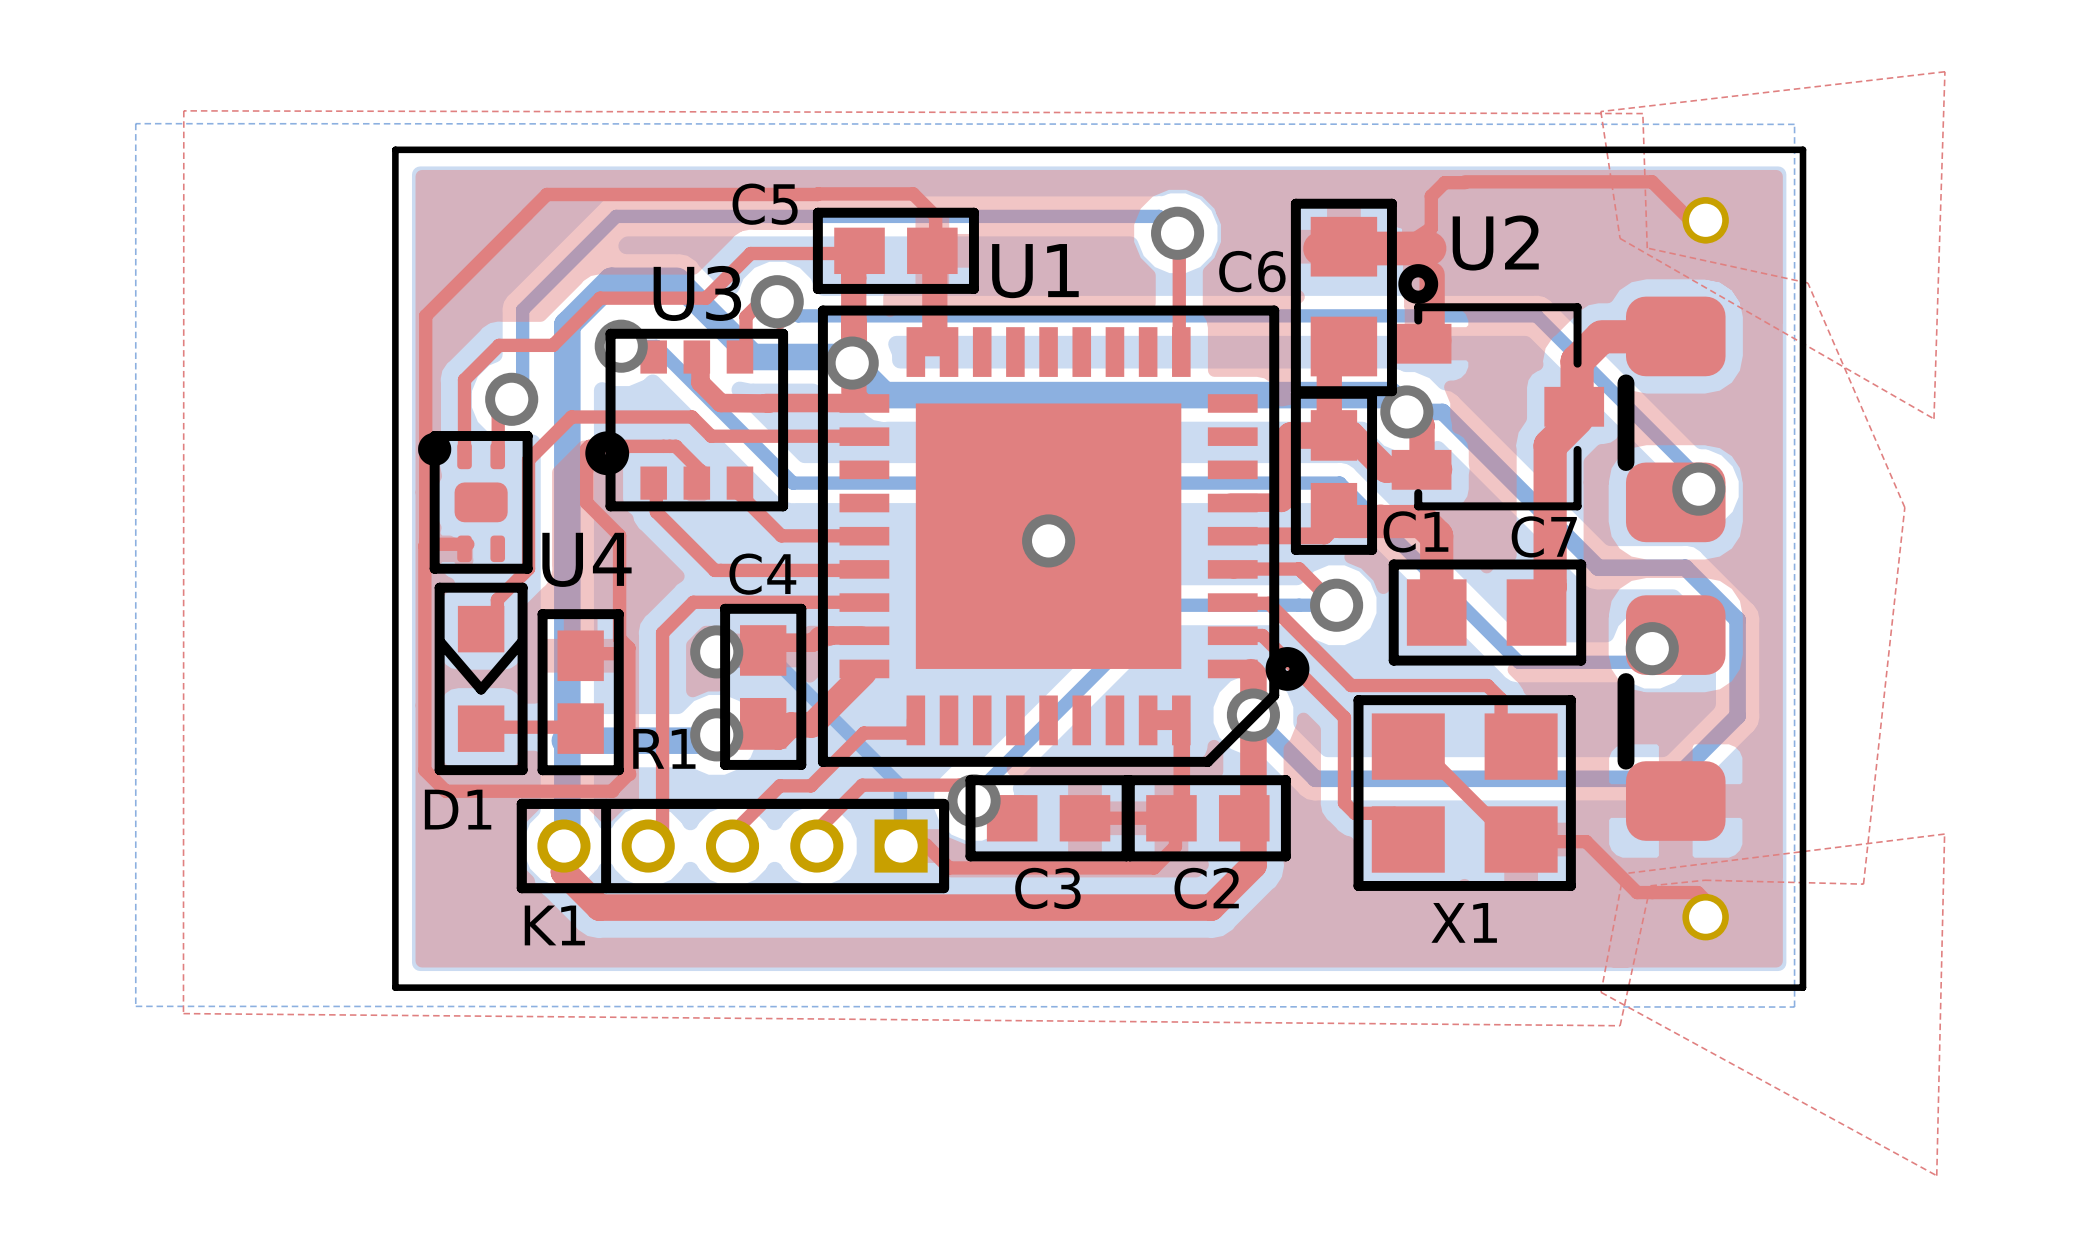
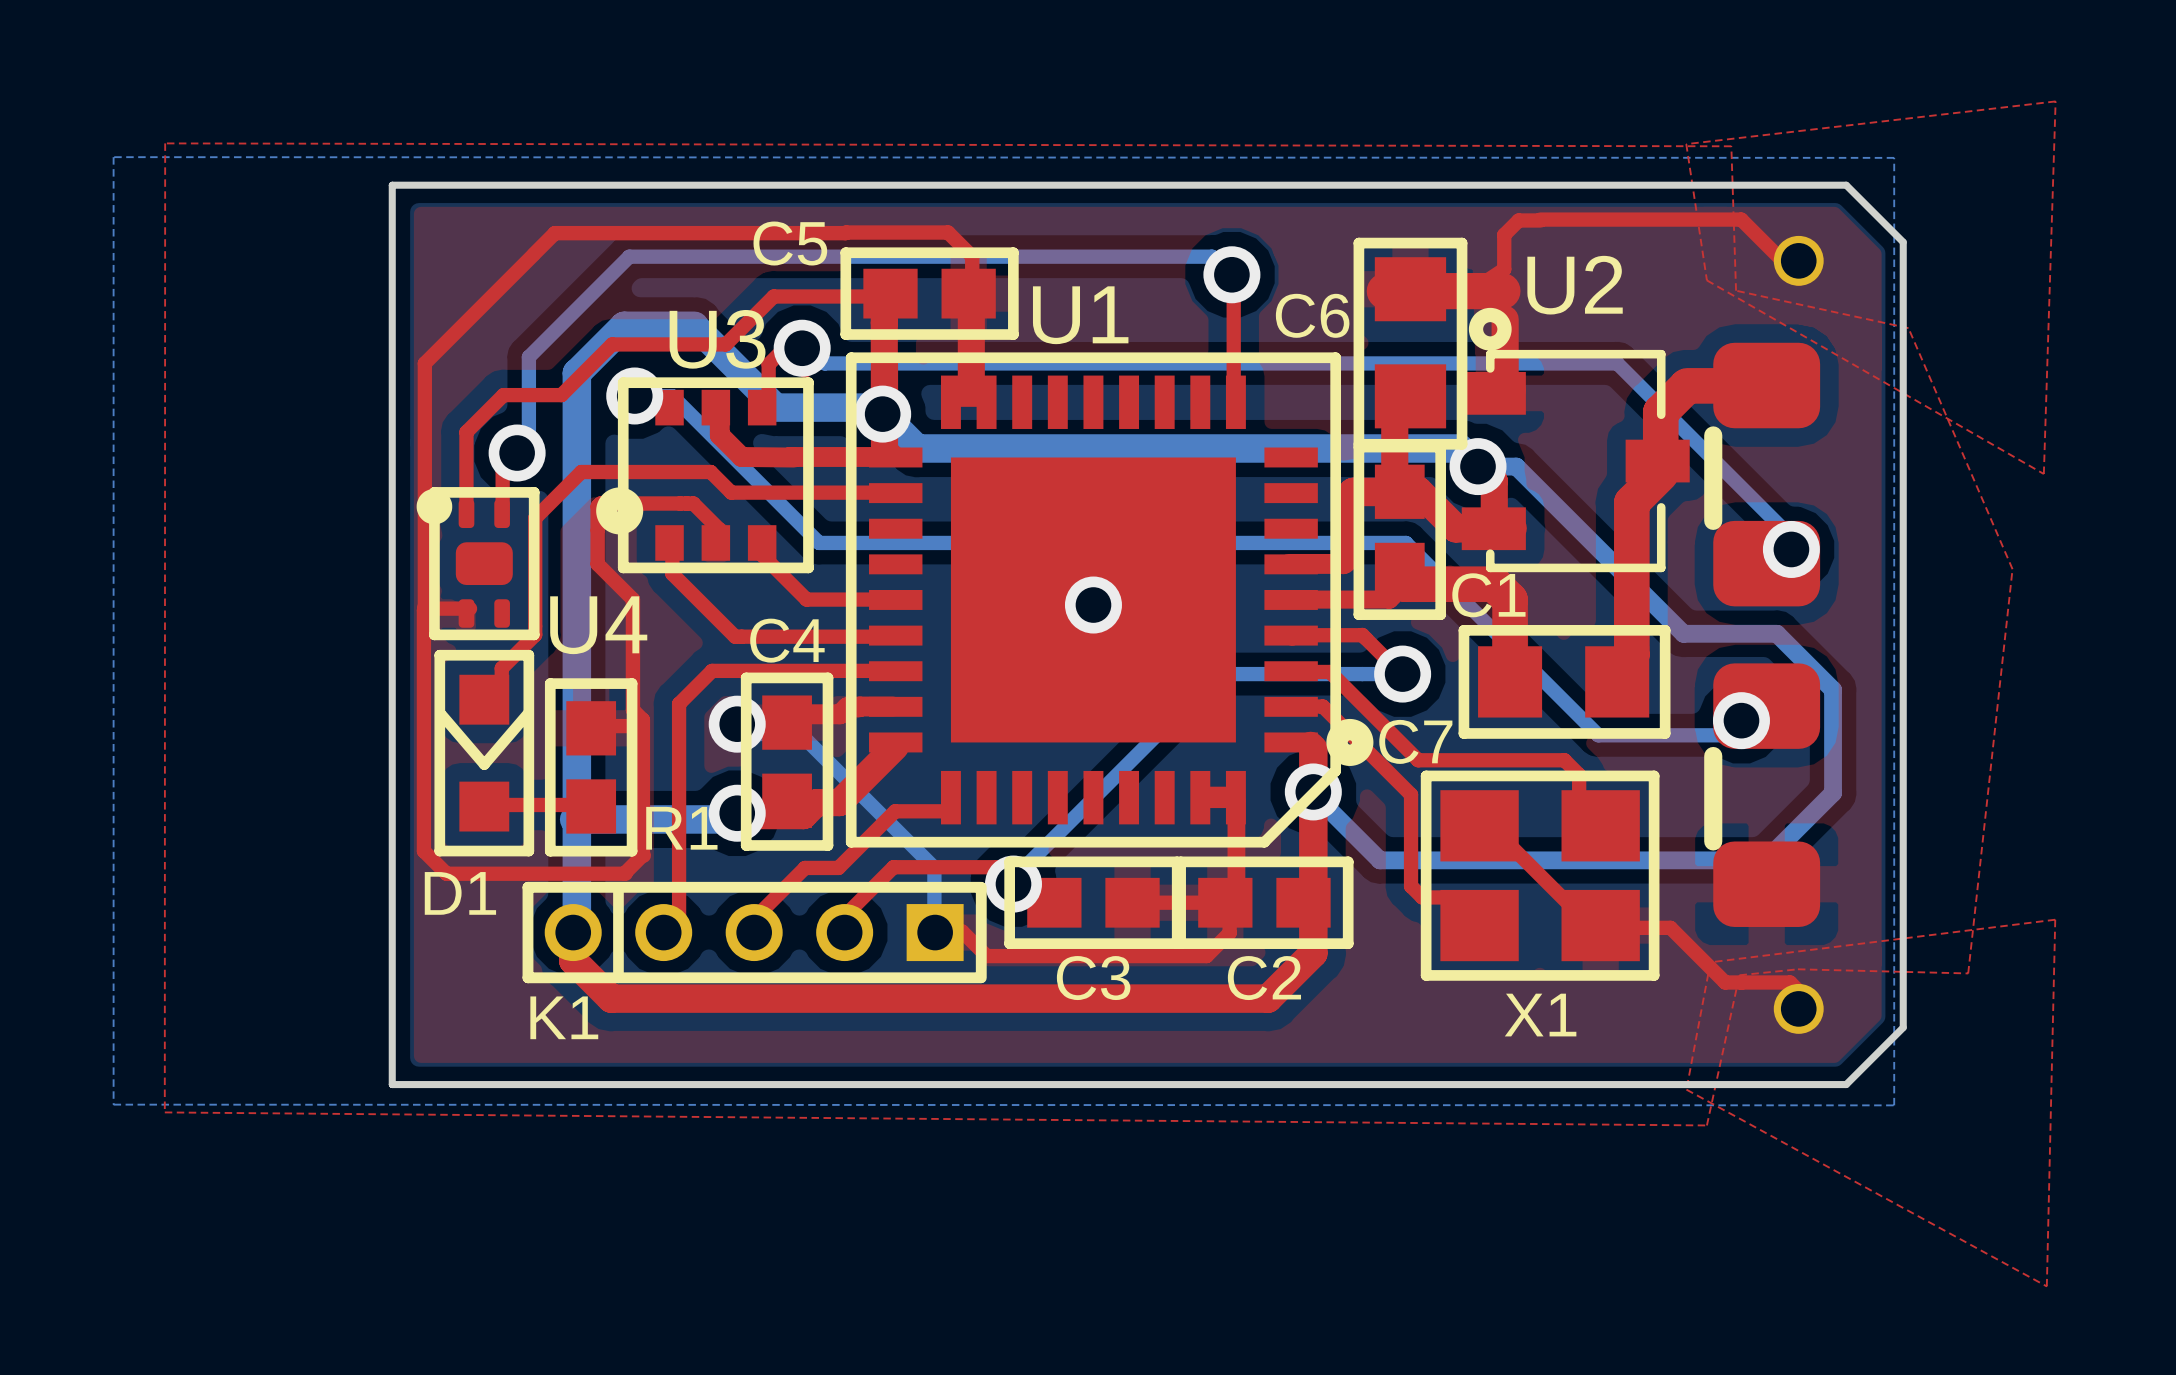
board edge: (1749, 149) (1802, 149) (1802, 202) -> (1846, 185) (1903, 242)
C7 name position: C7 (1544, 536) -> C7 (1415, 741)
board edge: (1802, 934) (1802, 987) (1749, 987) -> (1903, 1027) (1846, 1084)

